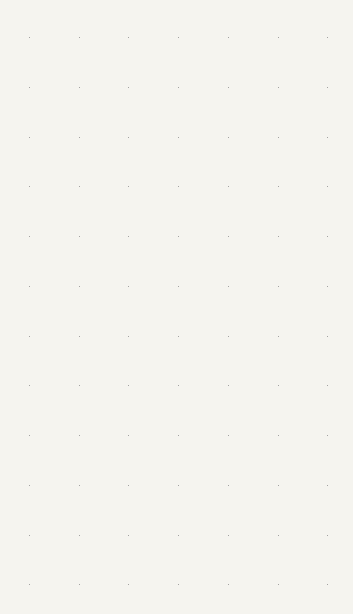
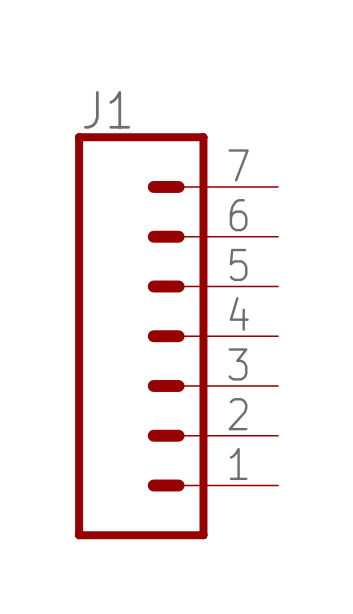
J1: none -> (176, 336)

